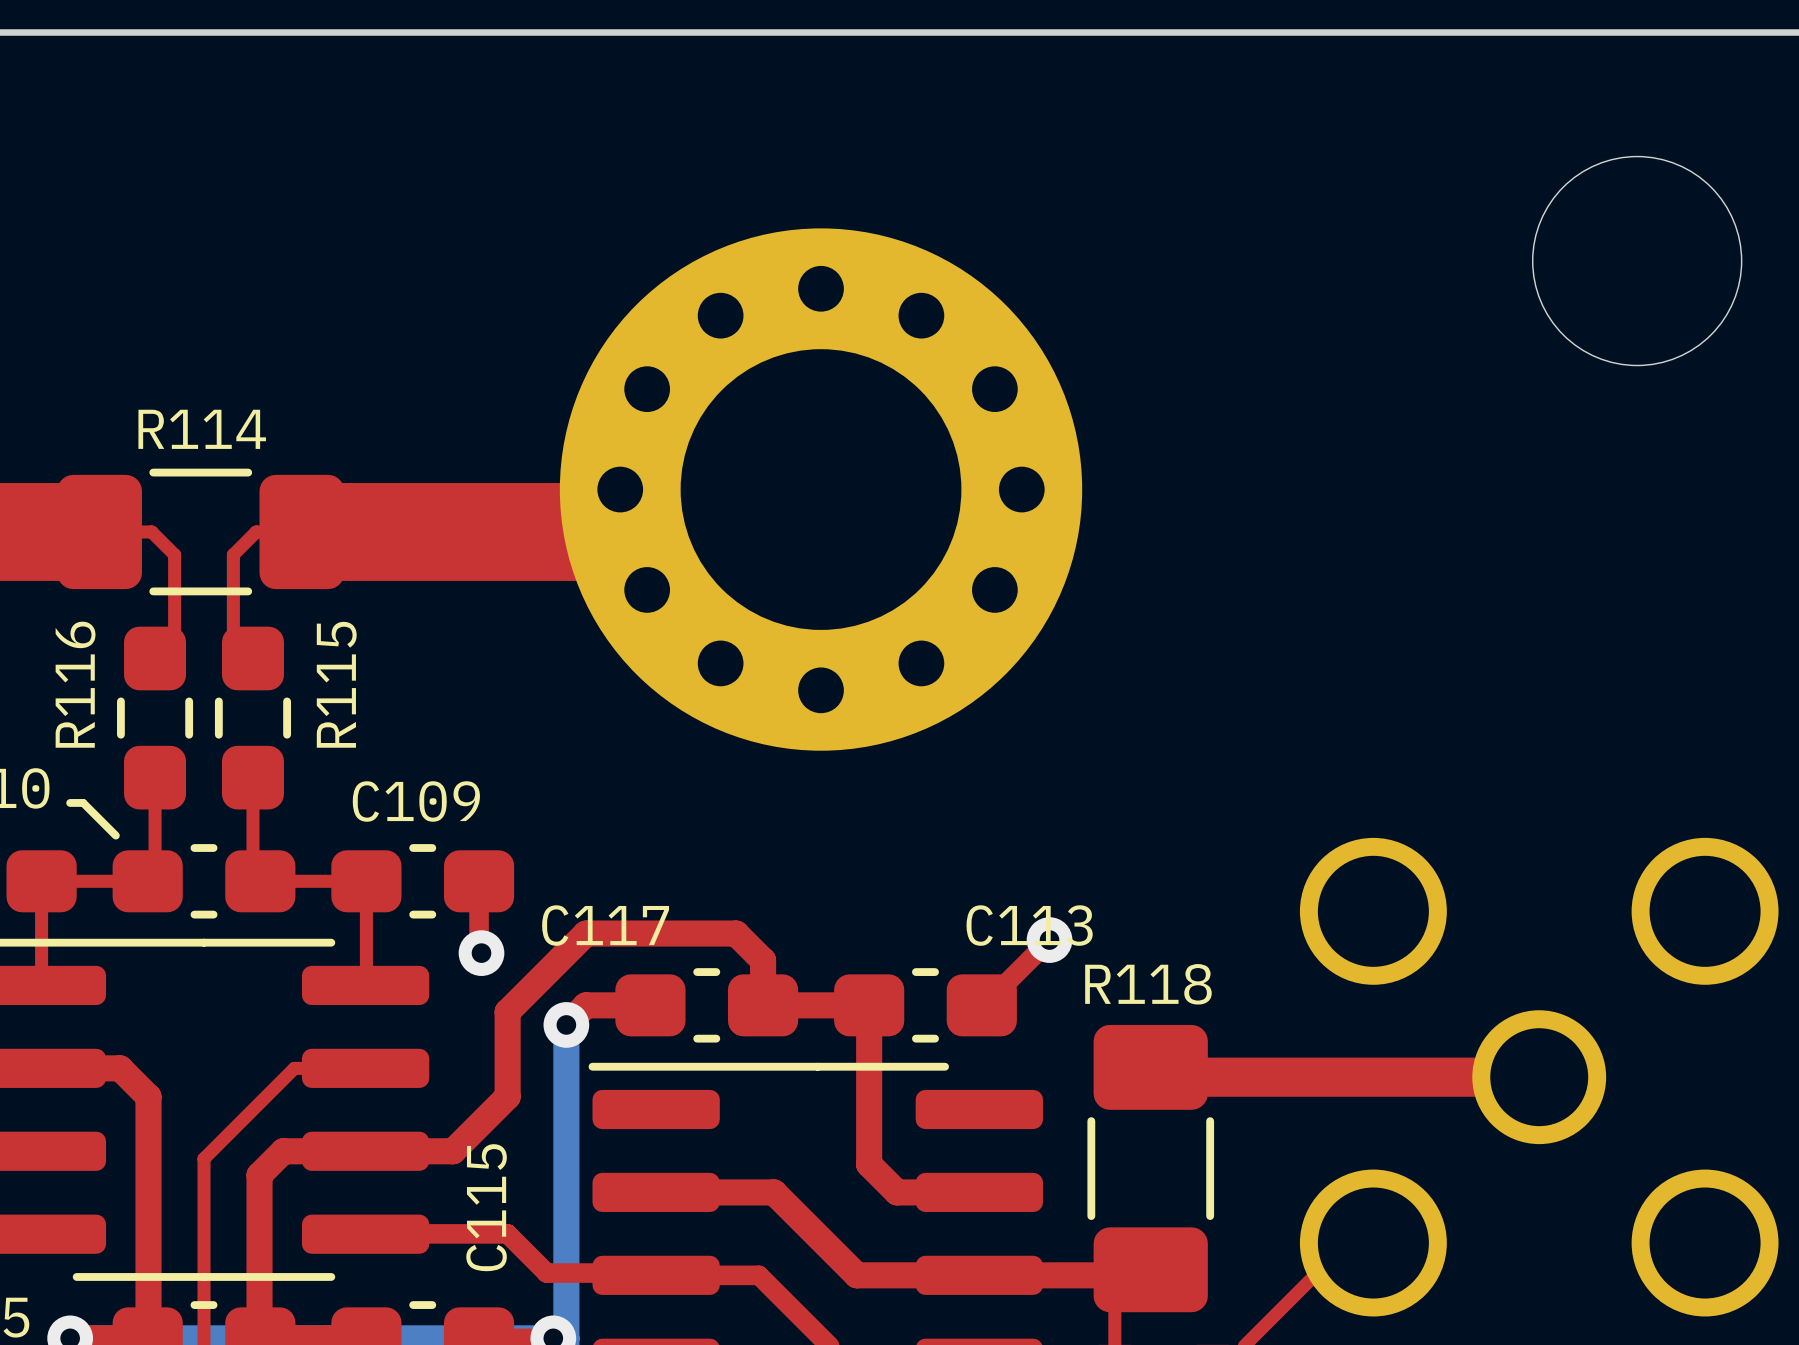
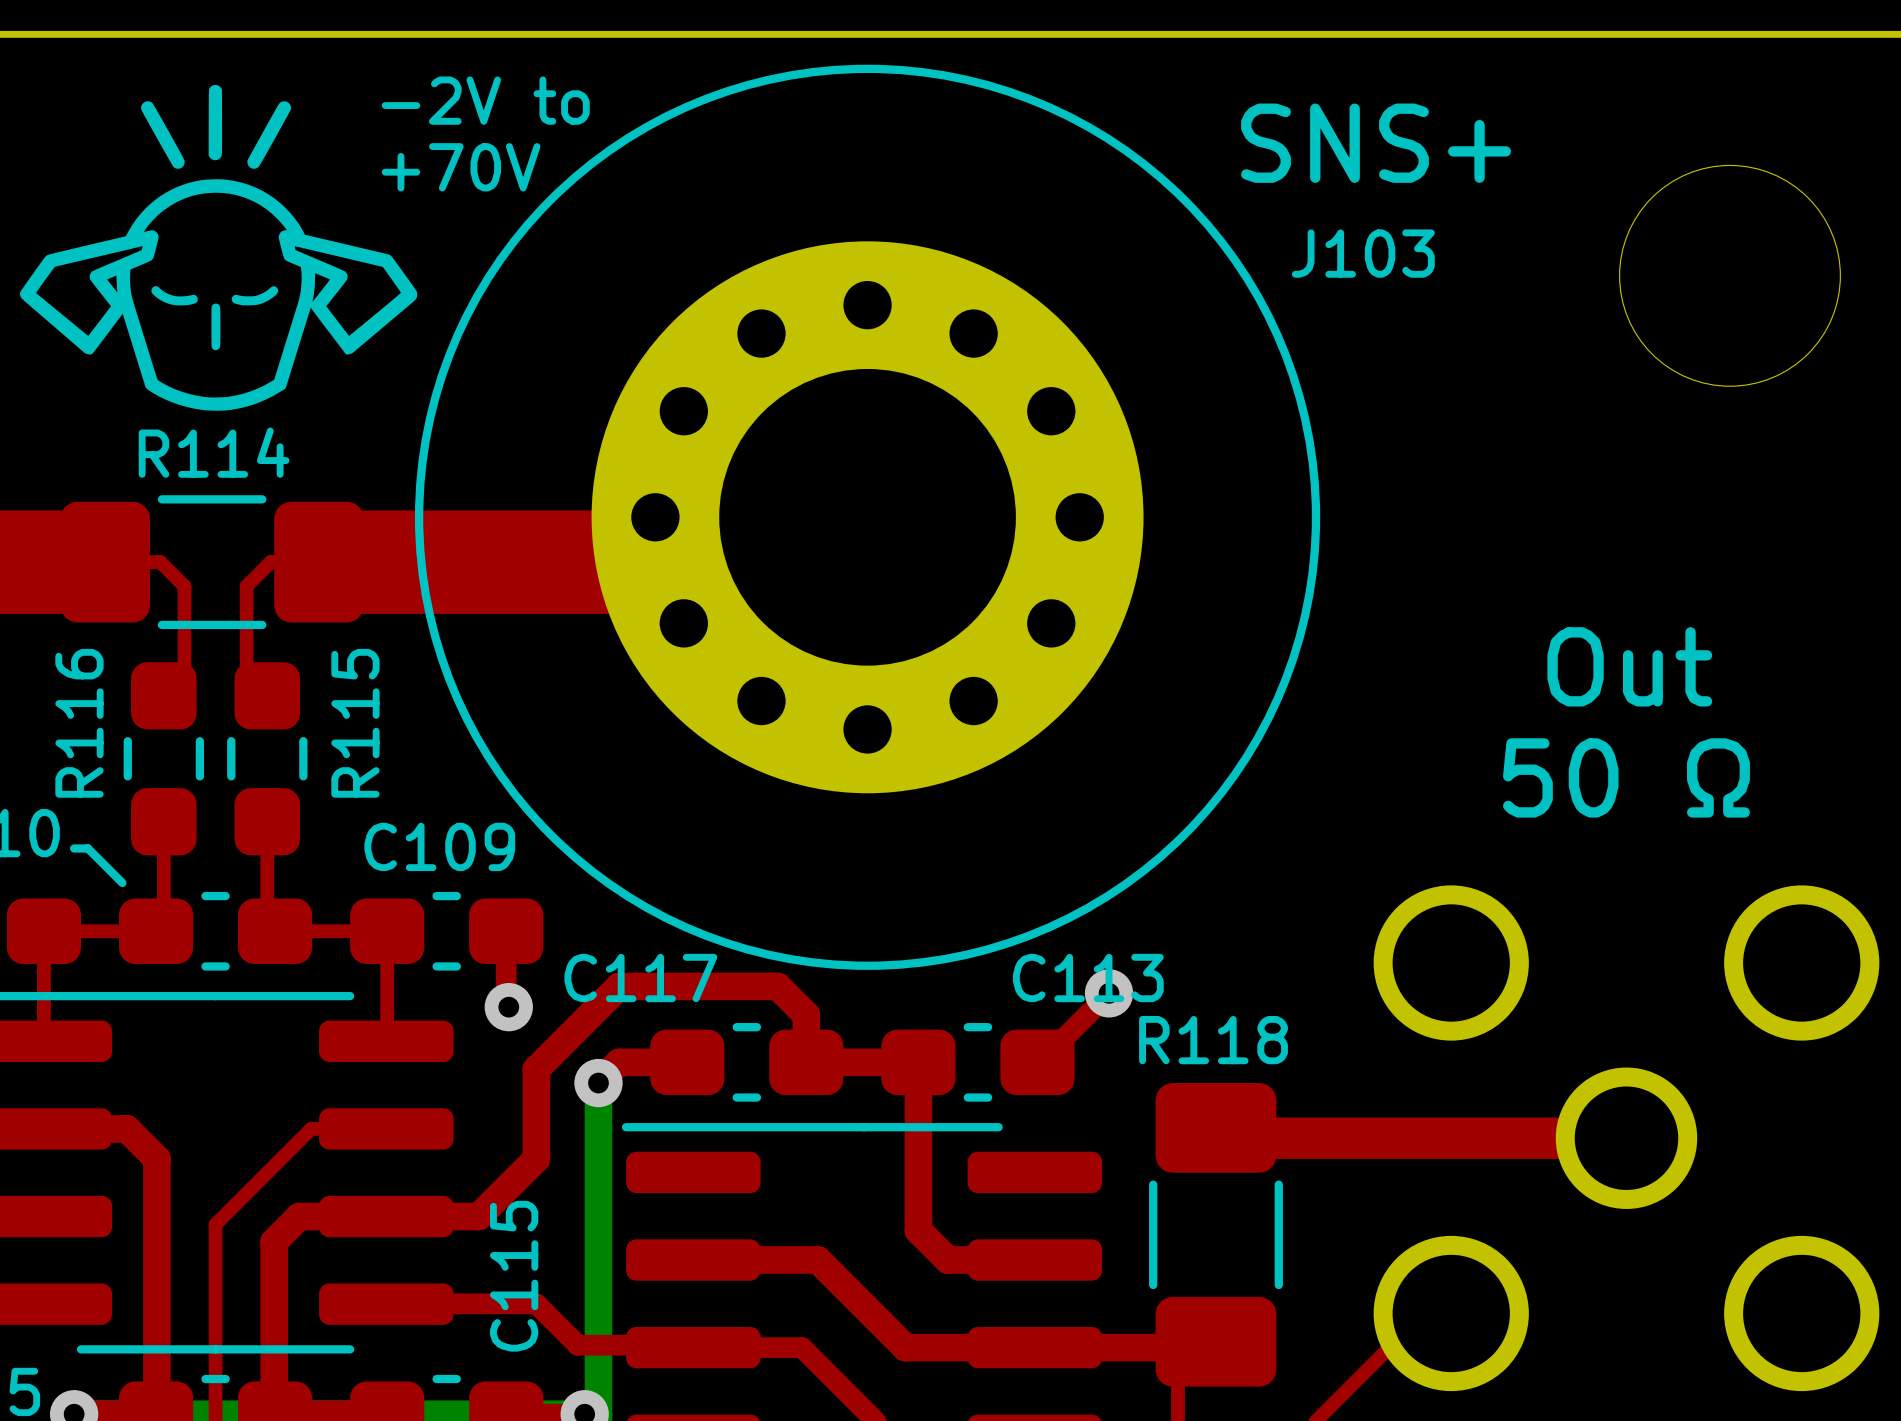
drawing: none -> [20, 84, 418, 411]
text: none -> -2V to (485, 100)
text: none -> SNS+ (1376, 143)
text: none -> +70V (461, 167)
J103 side: bottom (821, 489) -> top (867, 517)
text: none -> Out (1629, 666)
text: none -> 50 Ω (1626, 777)

